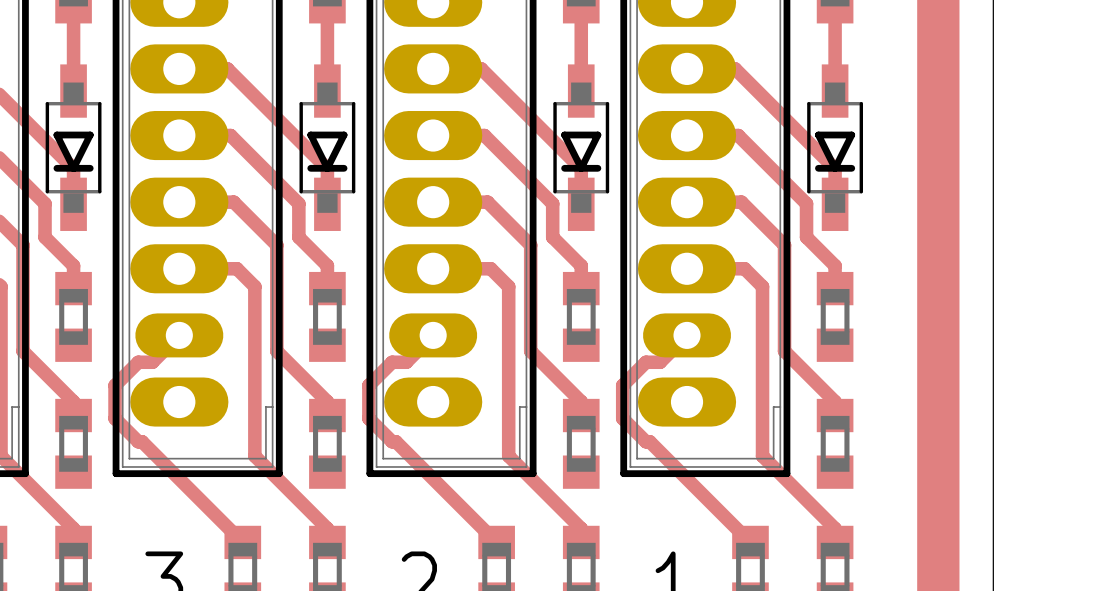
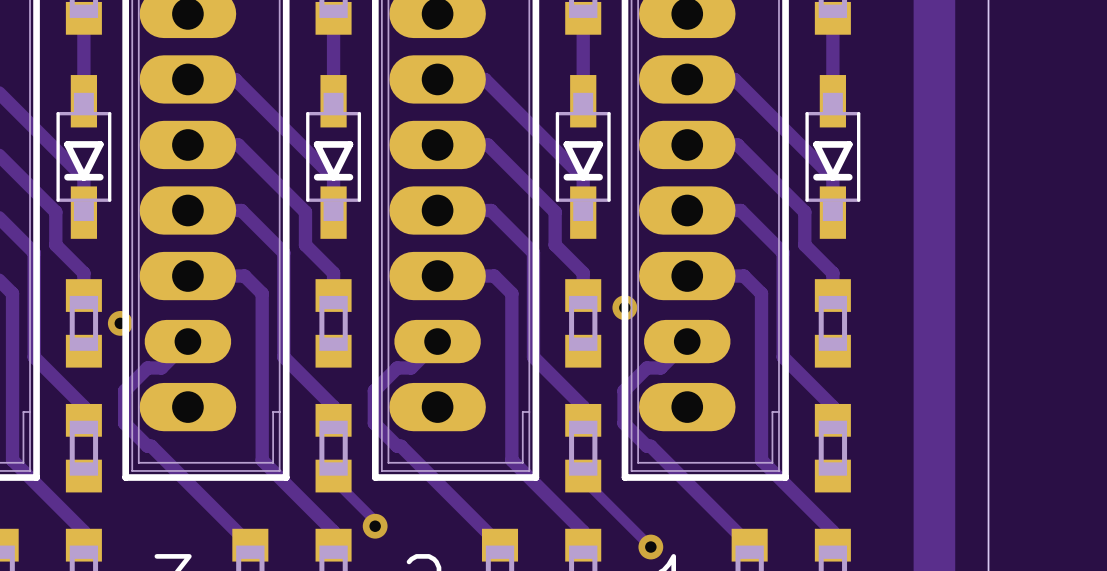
via: none -> (624, 307)
via: none -> (120, 323)
track: none -> (333, 476) (333, 479) (375, 521) (375, 526)
track: none -> (583, 476) (583, 479) (650, 547)
via: none -> (375, 526)
via: none -> (650, 547)

